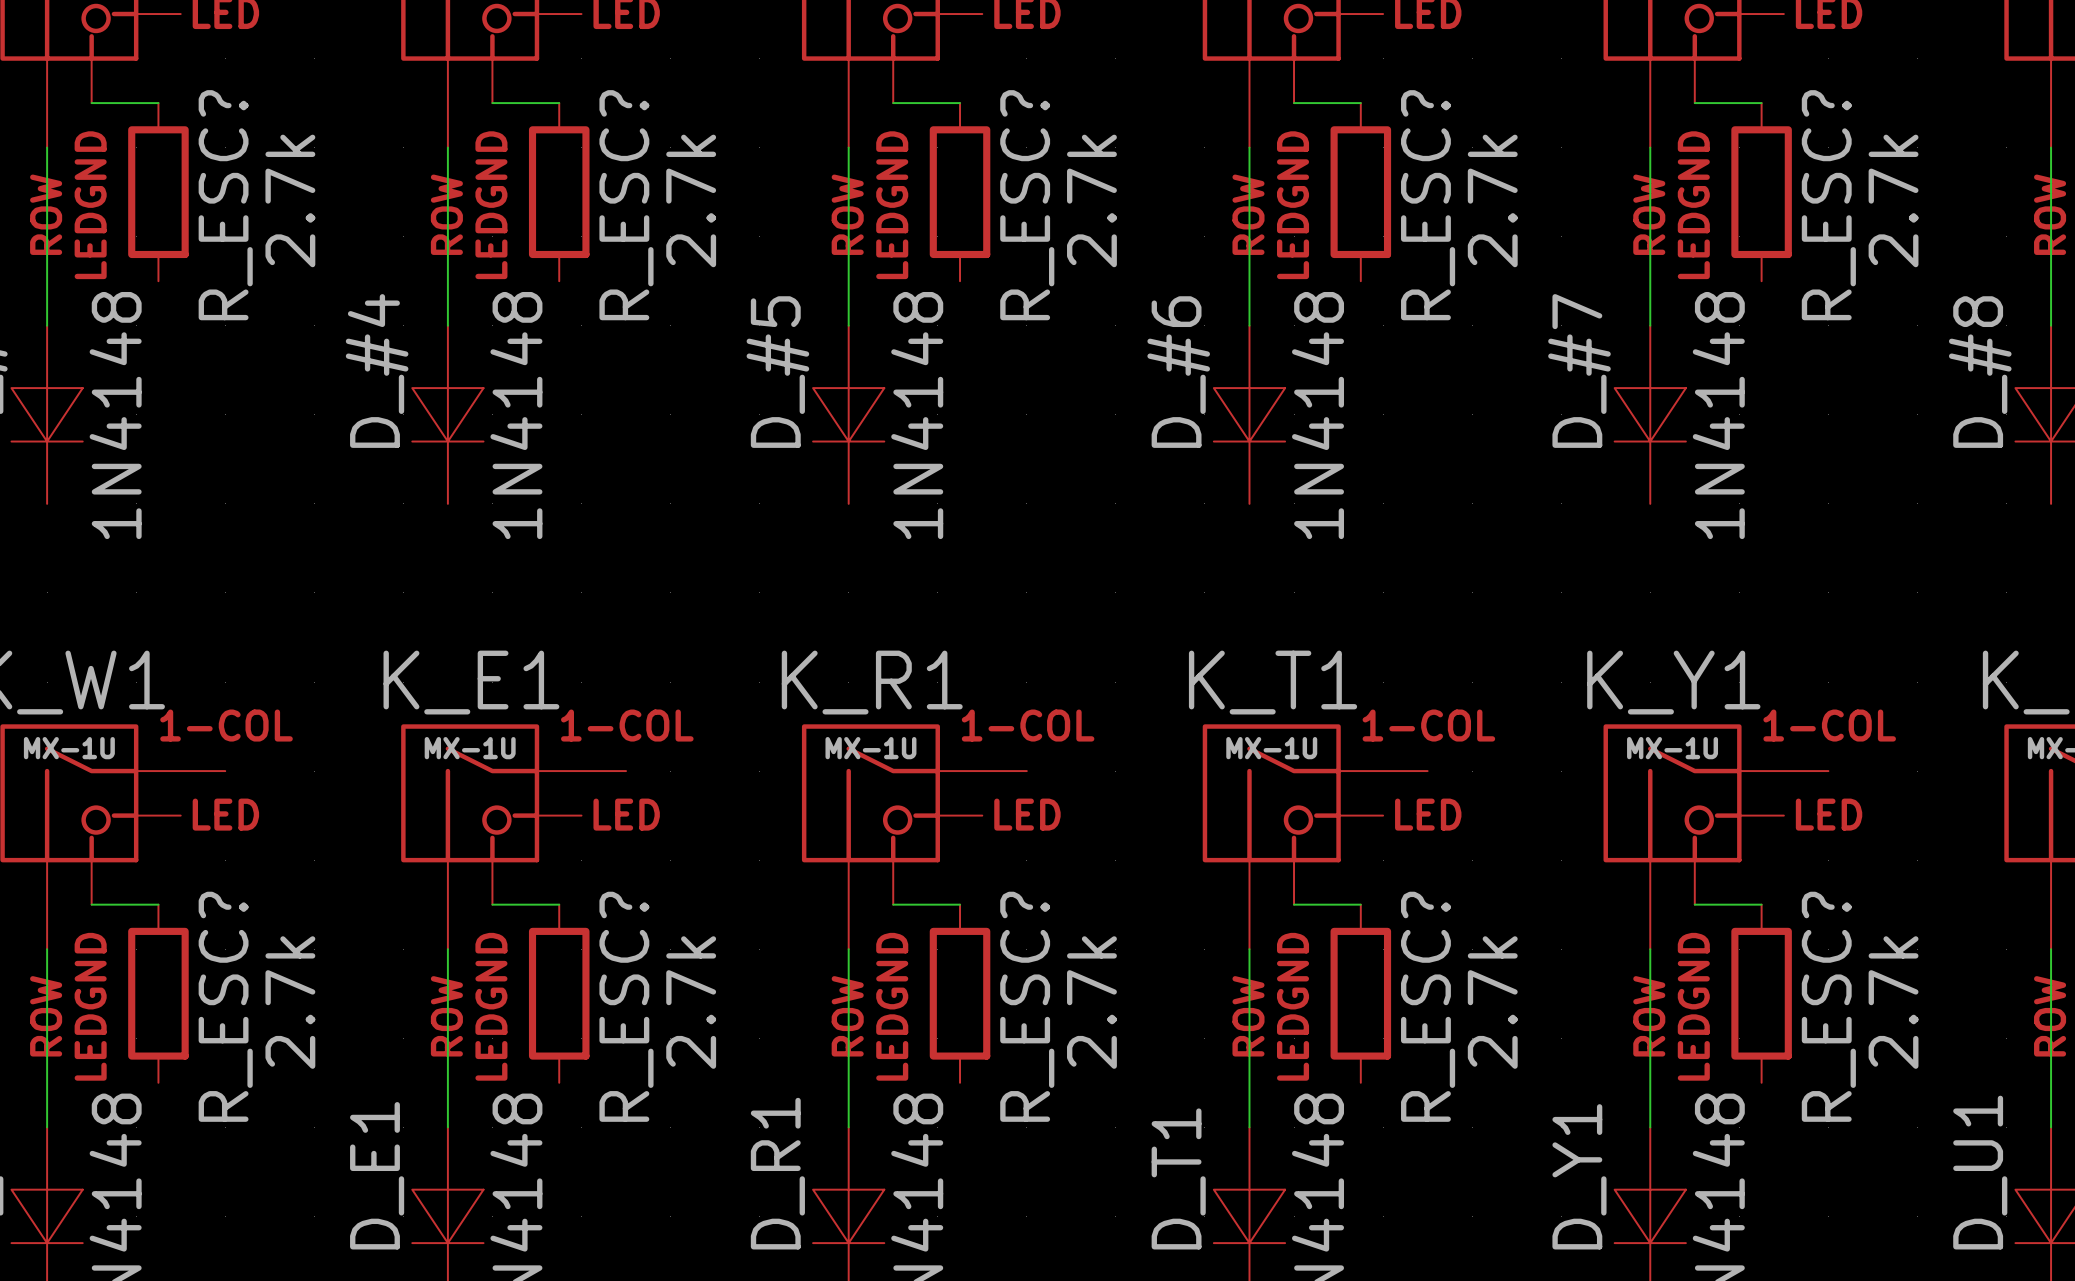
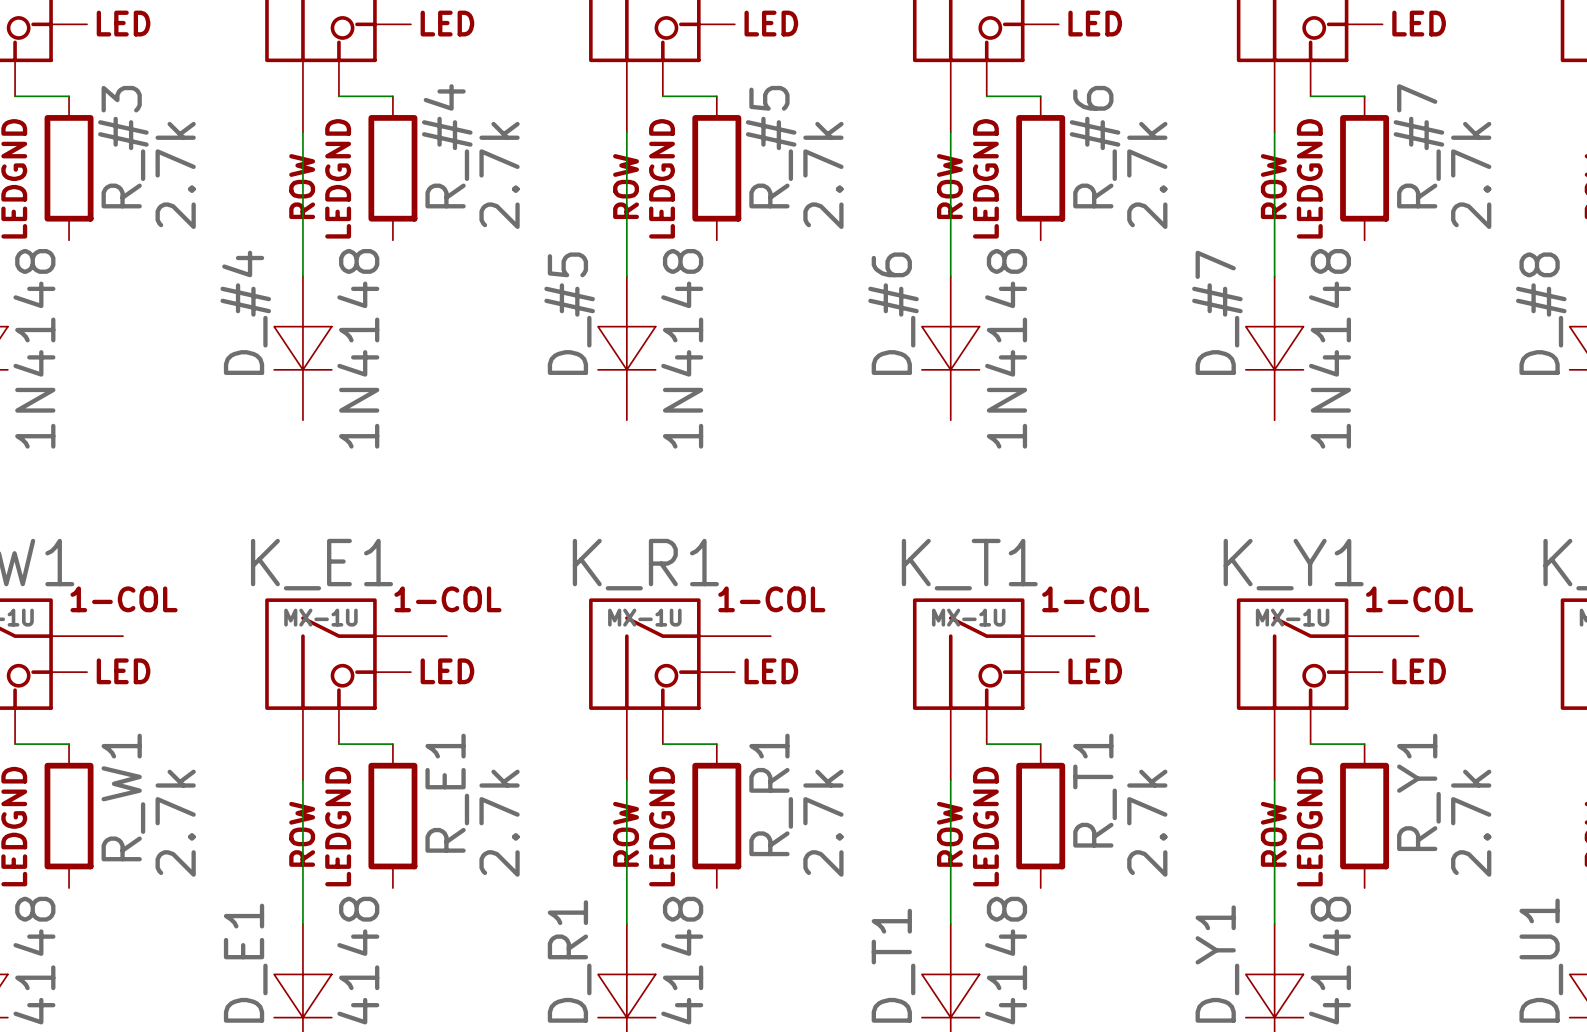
R_ESC? name: R_ESC? (225, 205) -> R_#3 (123, 147)
R_ESC? name: R_ESC? (626, 205) -> R_#4 (447, 146)
R_ESC? name: R_ESC? (1027, 205) -> R_#5 (771, 147)
R_ESC? name: R_ESC? (1428, 205) -> R_#6 (1095, 147)
R_ESC? name: R_ESC? (1828, 205) -> R_#7 (1418, 146)
R_ESC? name: R_ESC? (225, 1006) -> R_W1 (123, 797)
R_ESC? name: R_ESC? (626, 1006) -> R_E1 (447, 793)
R_ESC? name: R_ESC? (1027, 1006) -> R_R1 (771, 794)
R_ESC? name: R_ESC? (1428, 1006) -> R_T1 (1095, 790)
R_ESC? name: R_ESC? (1828, 1006) -> R_Y1 (1418, 792)

